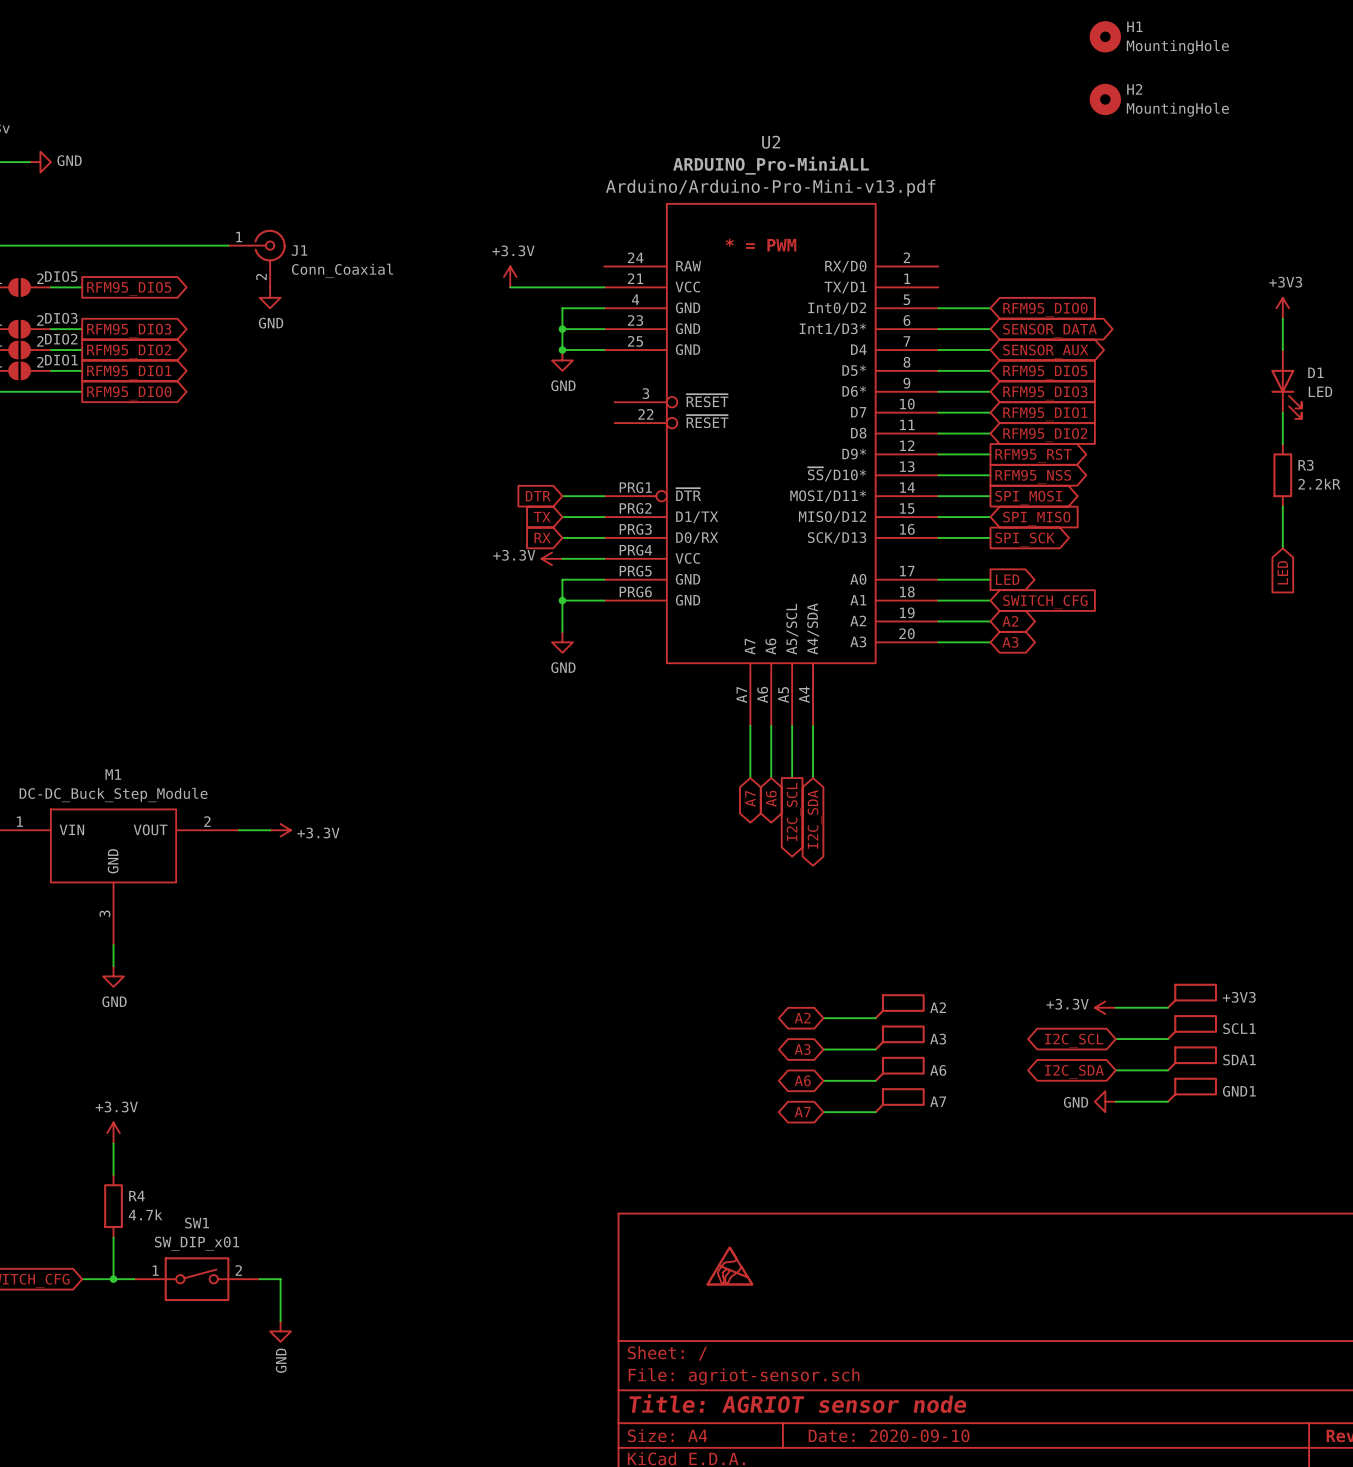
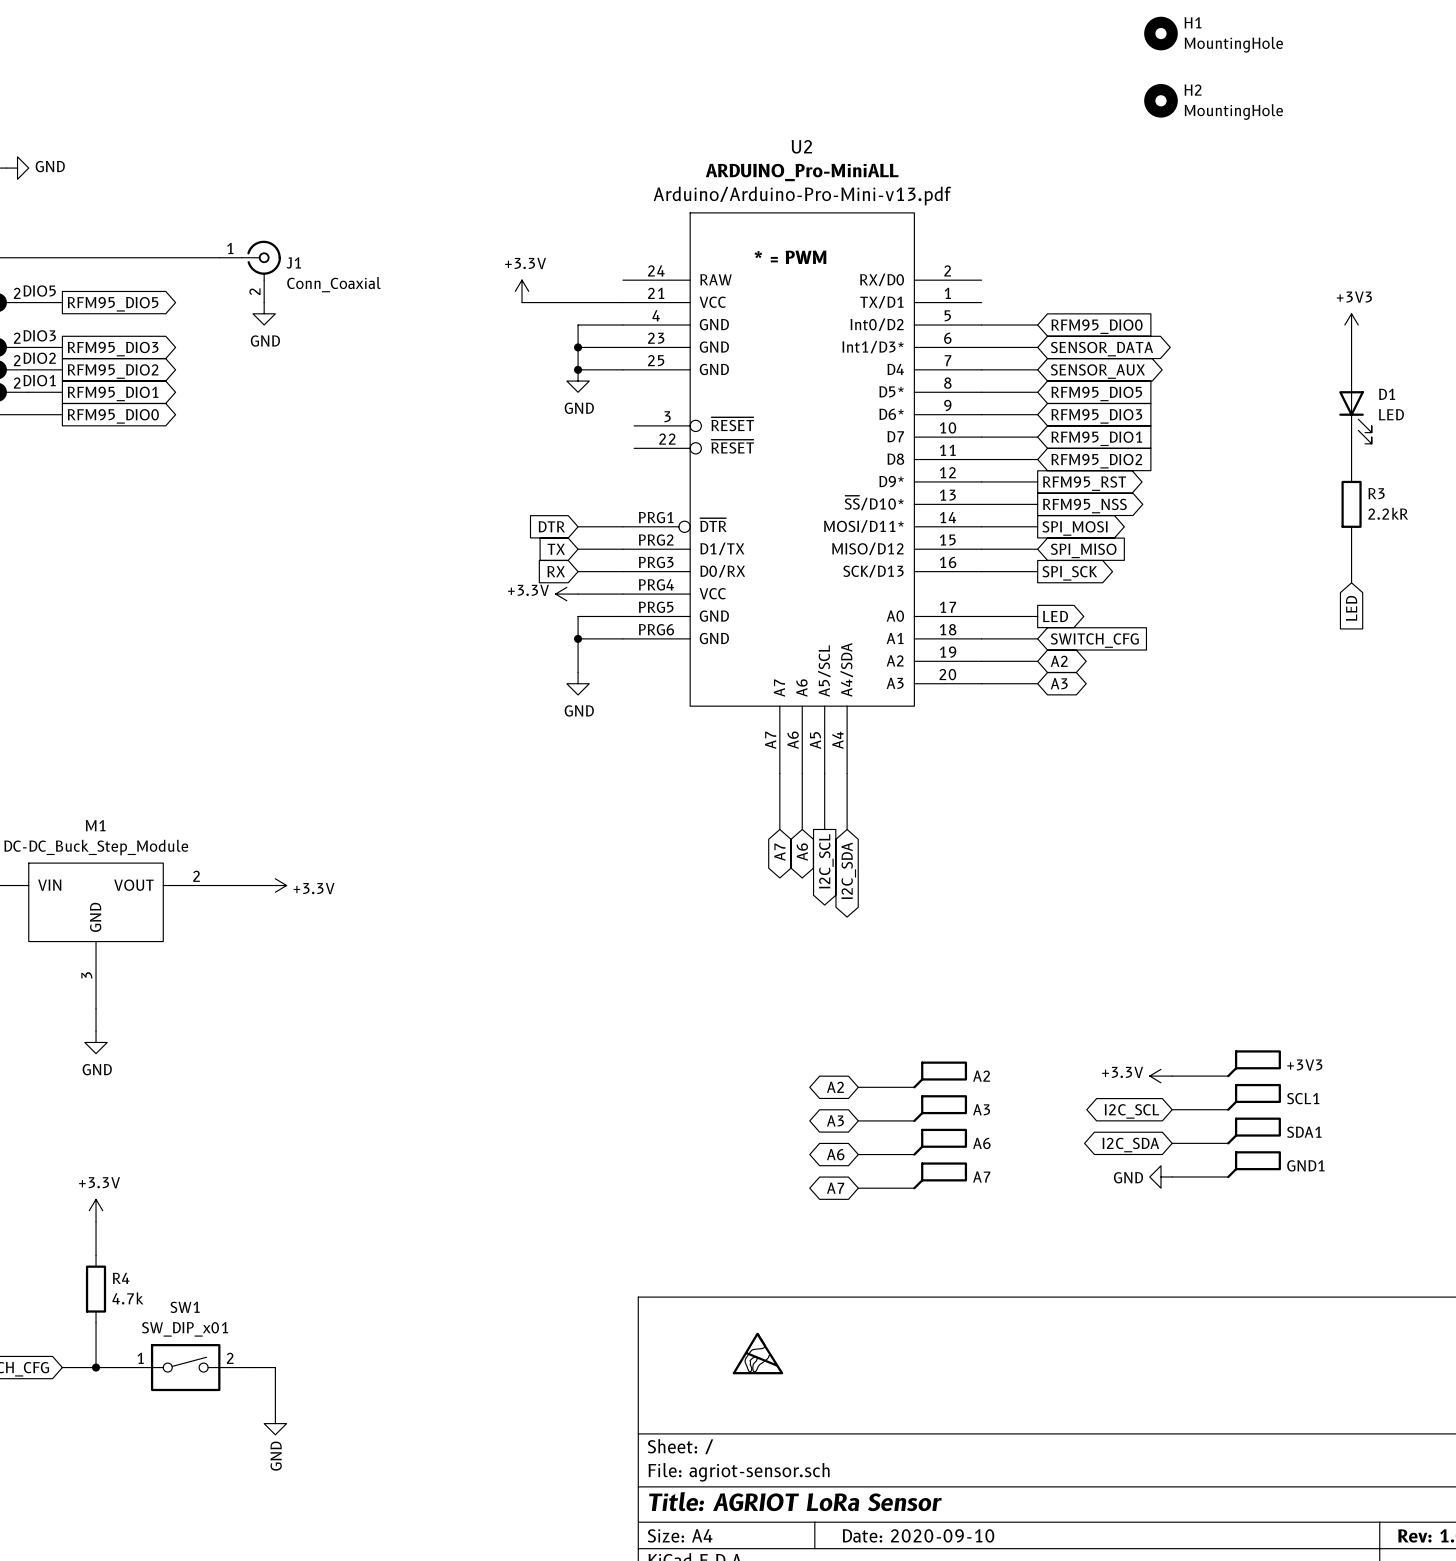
title block: Title: AGRIOT sensor node (797, 1403) -> Title: AGRIOT LoRa Sensor (795, 1501)

